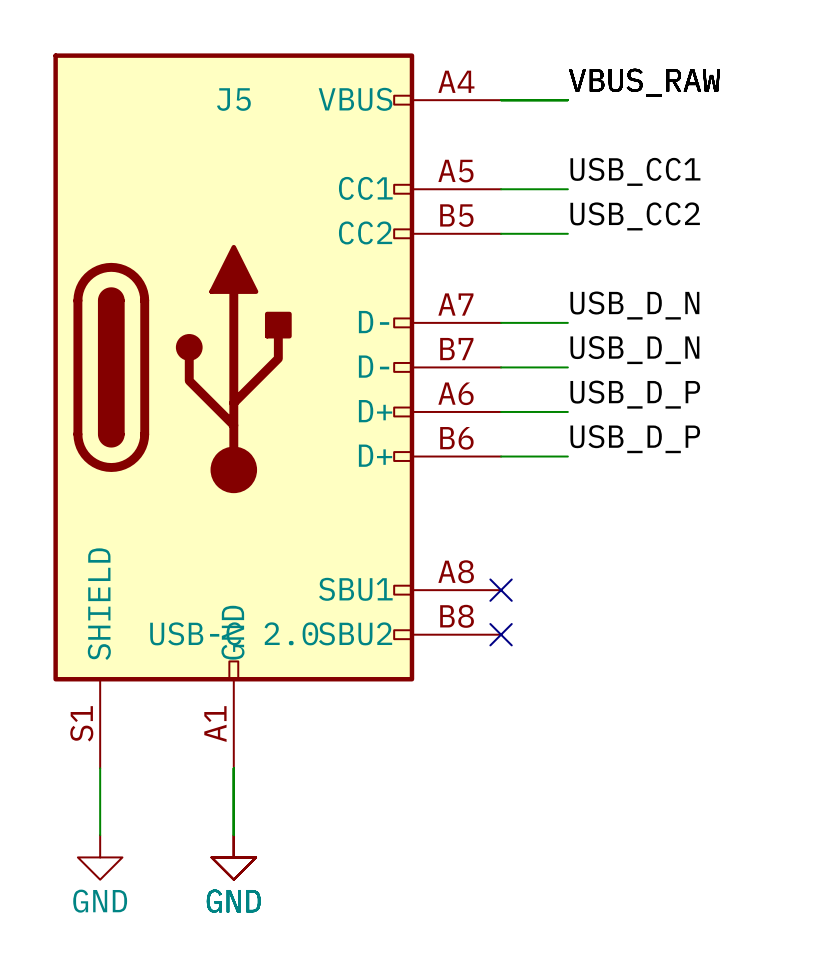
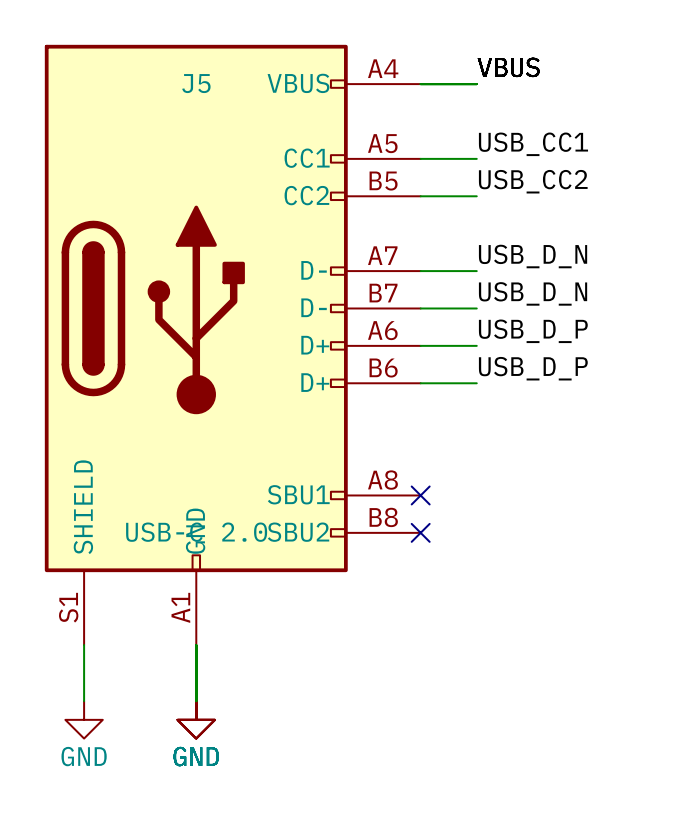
label: VBUS_RAW (644, 82) -> VBUS (508, 67)

